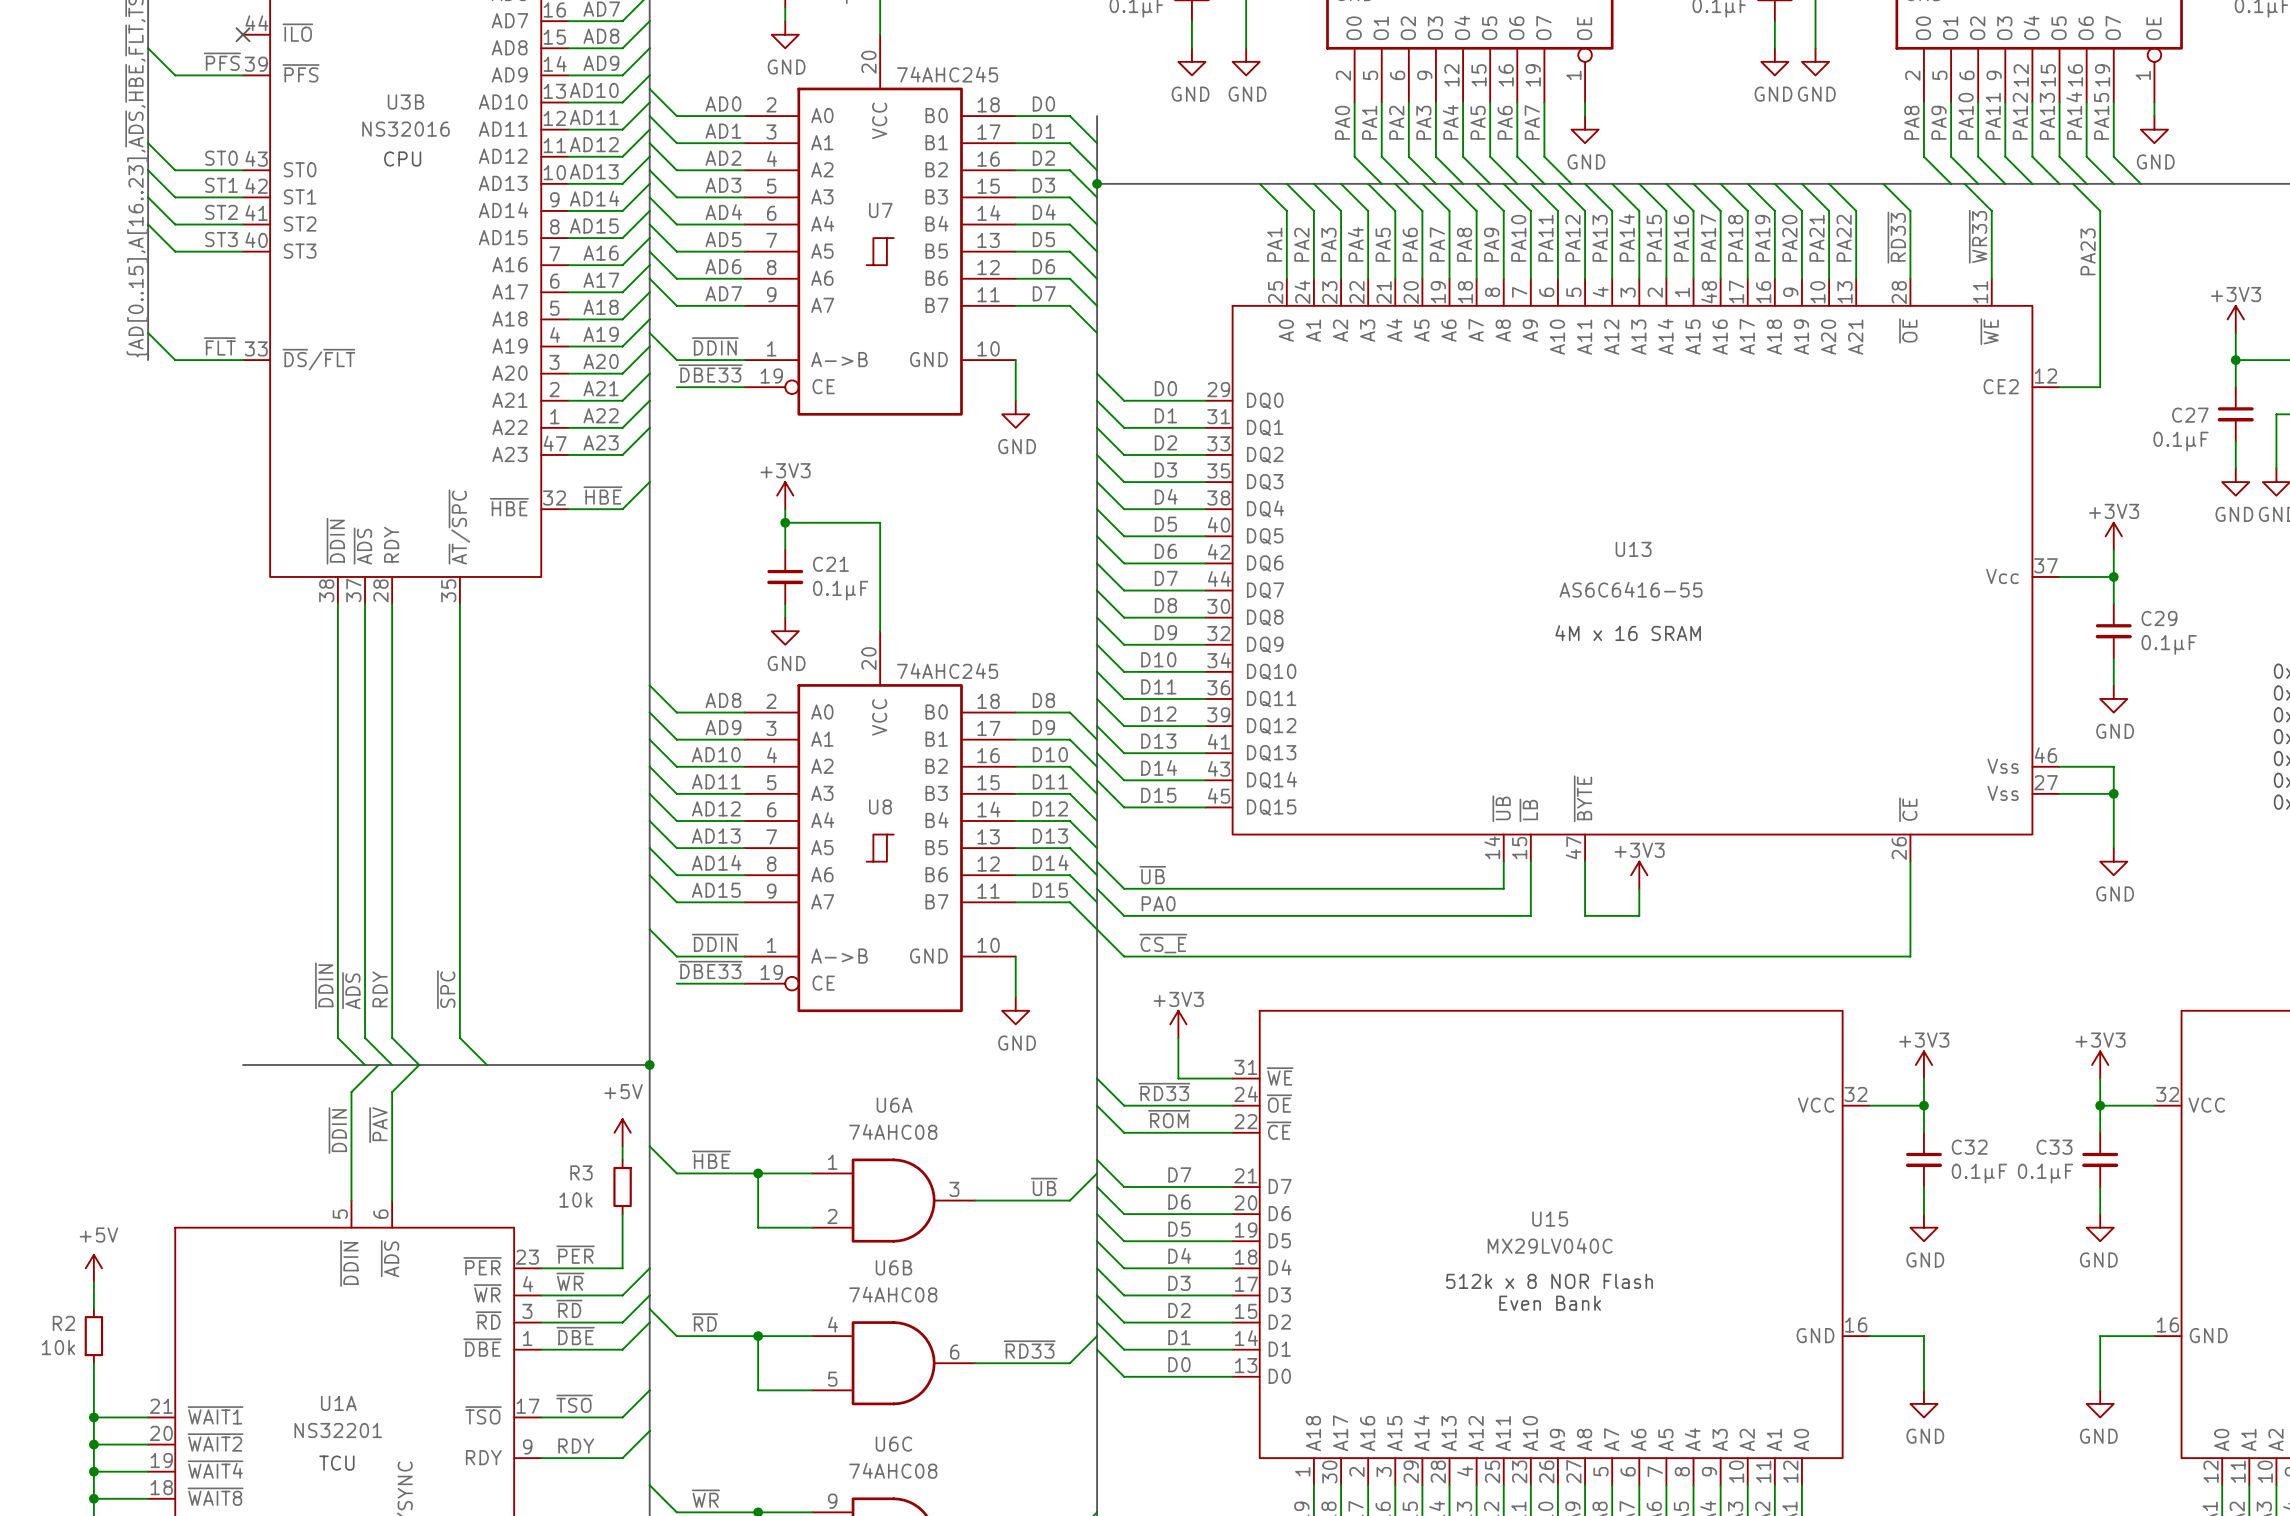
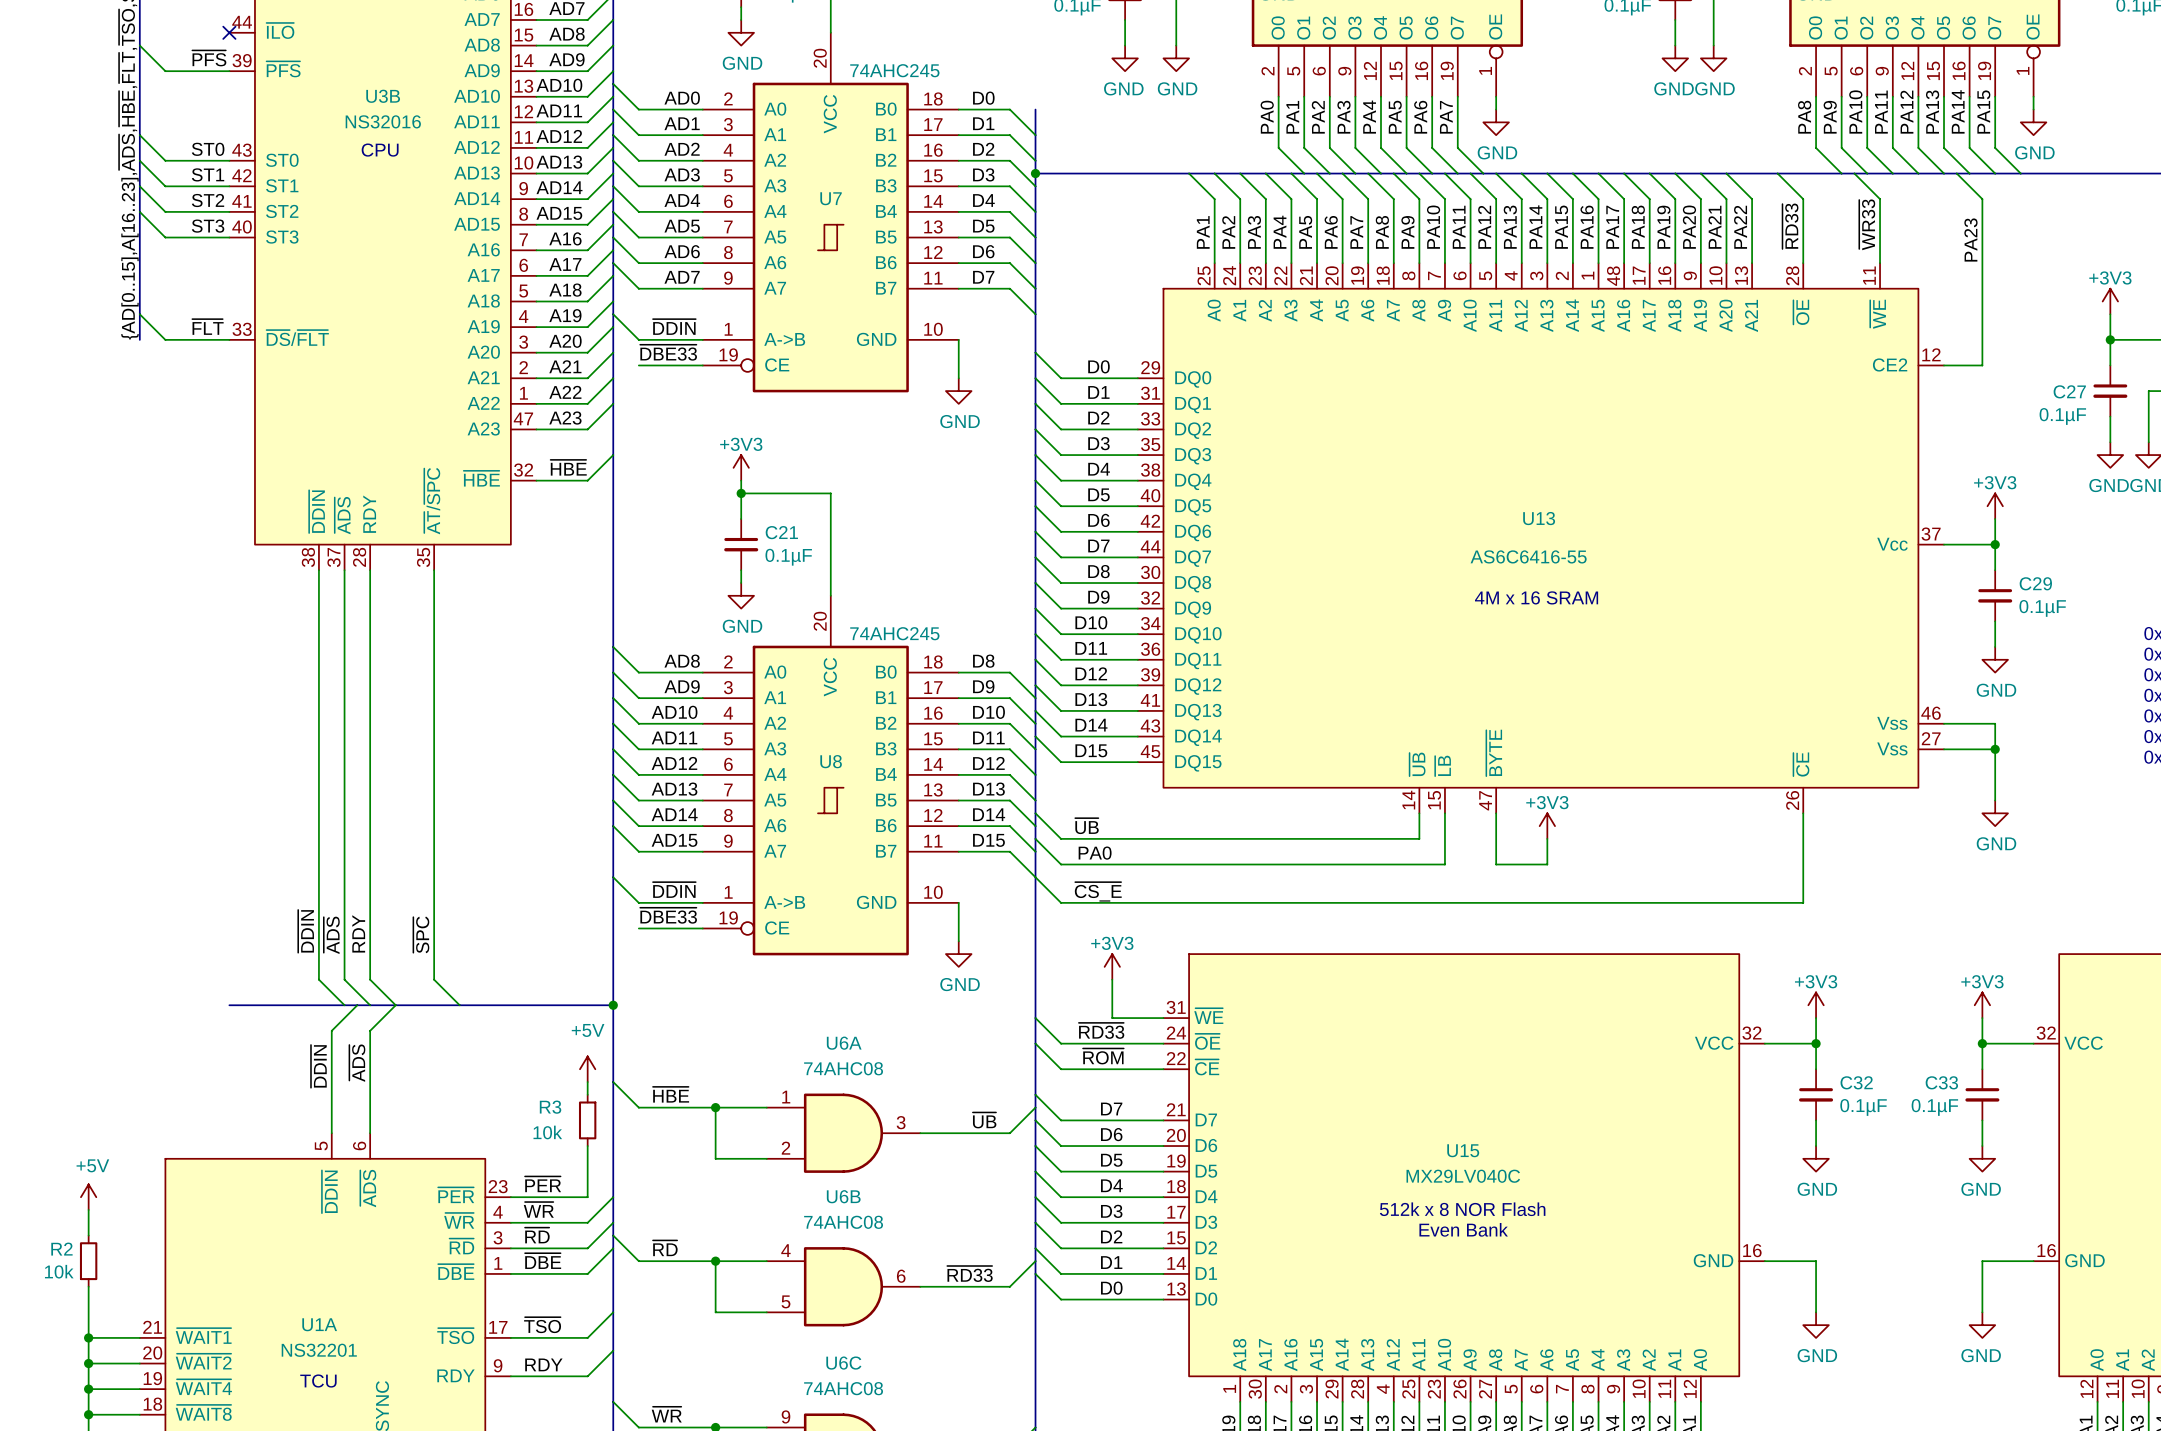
label: ~{PAV} (378, 1125) -> ~{ADS} (357, 1063)

